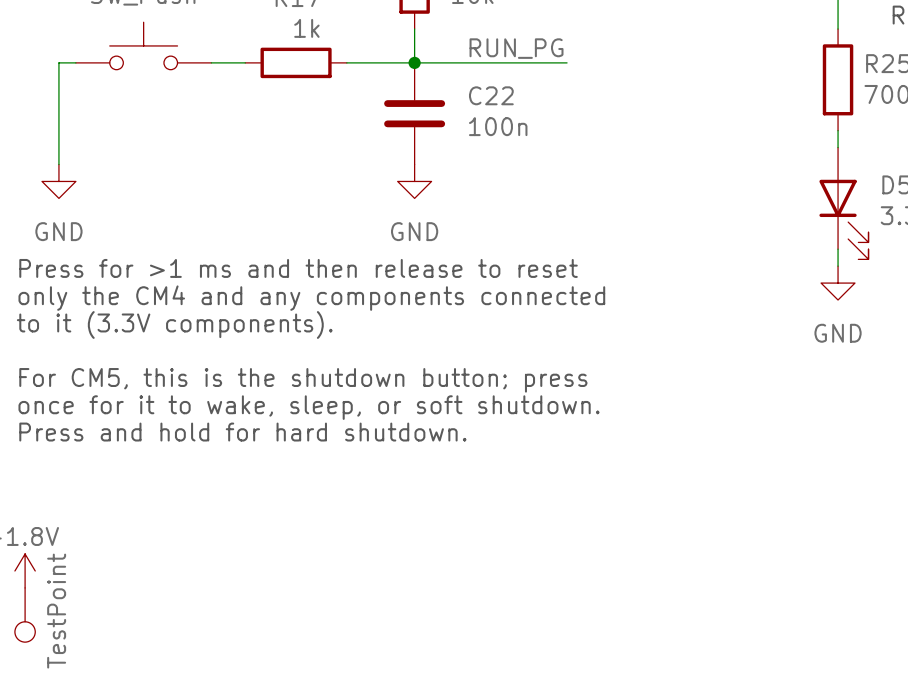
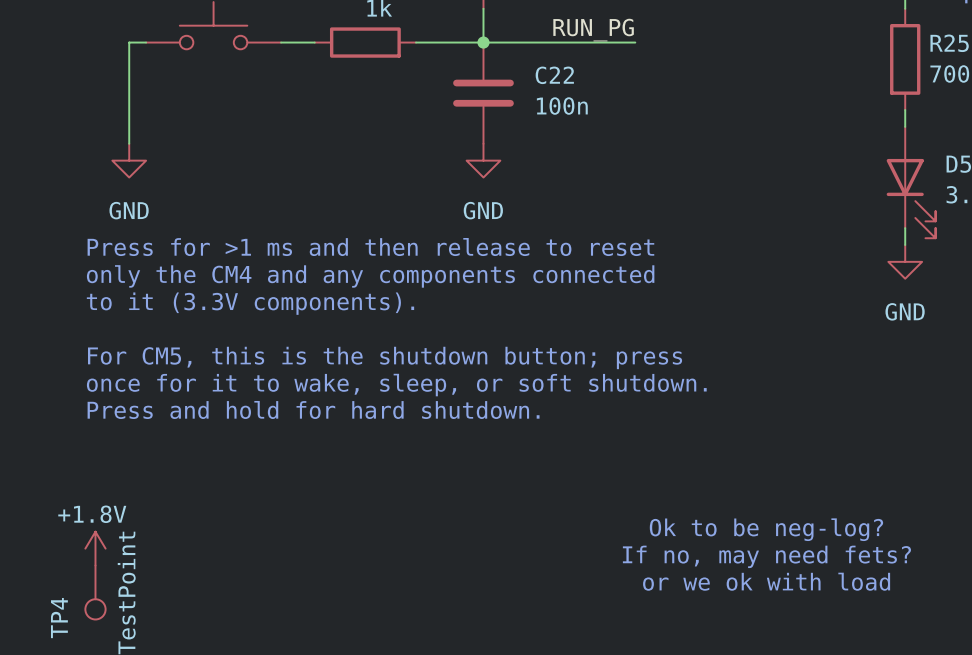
text: none -> Ok to be neg-log? (766, 529)
text: none -> If no, may need fets? (766, 556)
text: none -> or we ok with load (766, 581)

